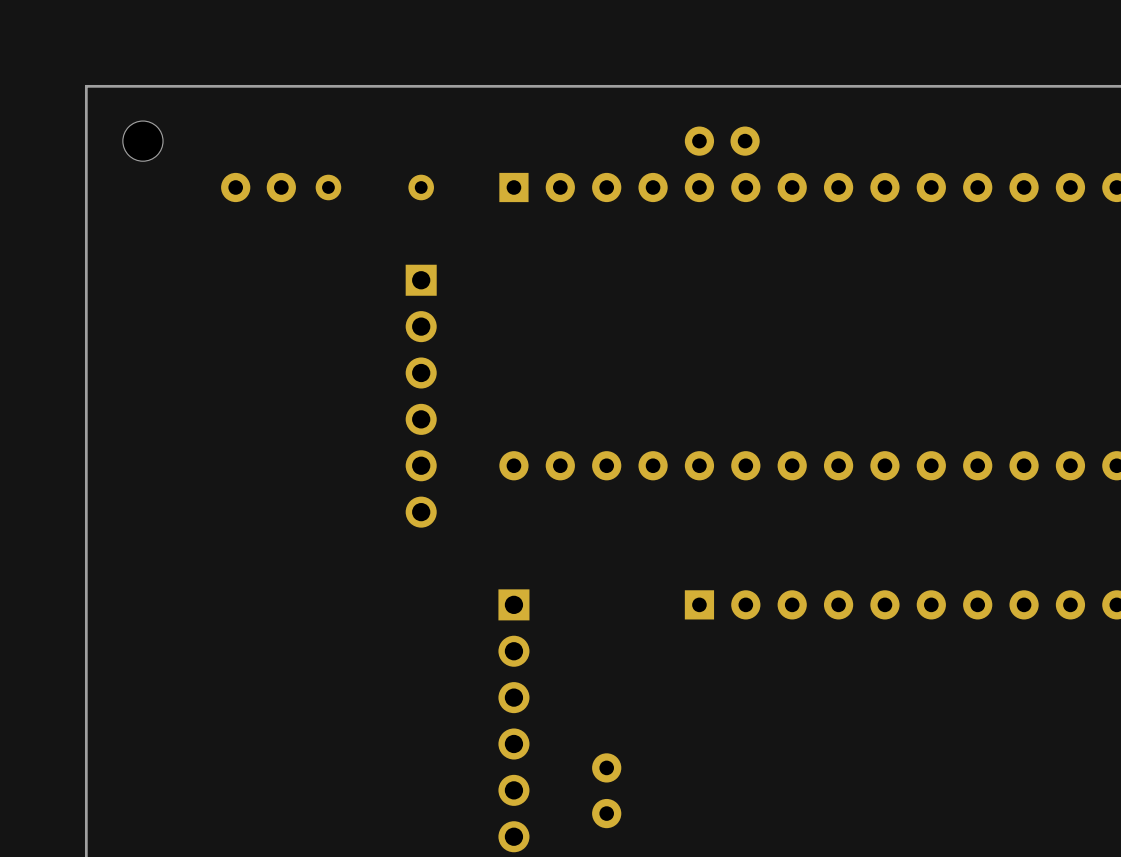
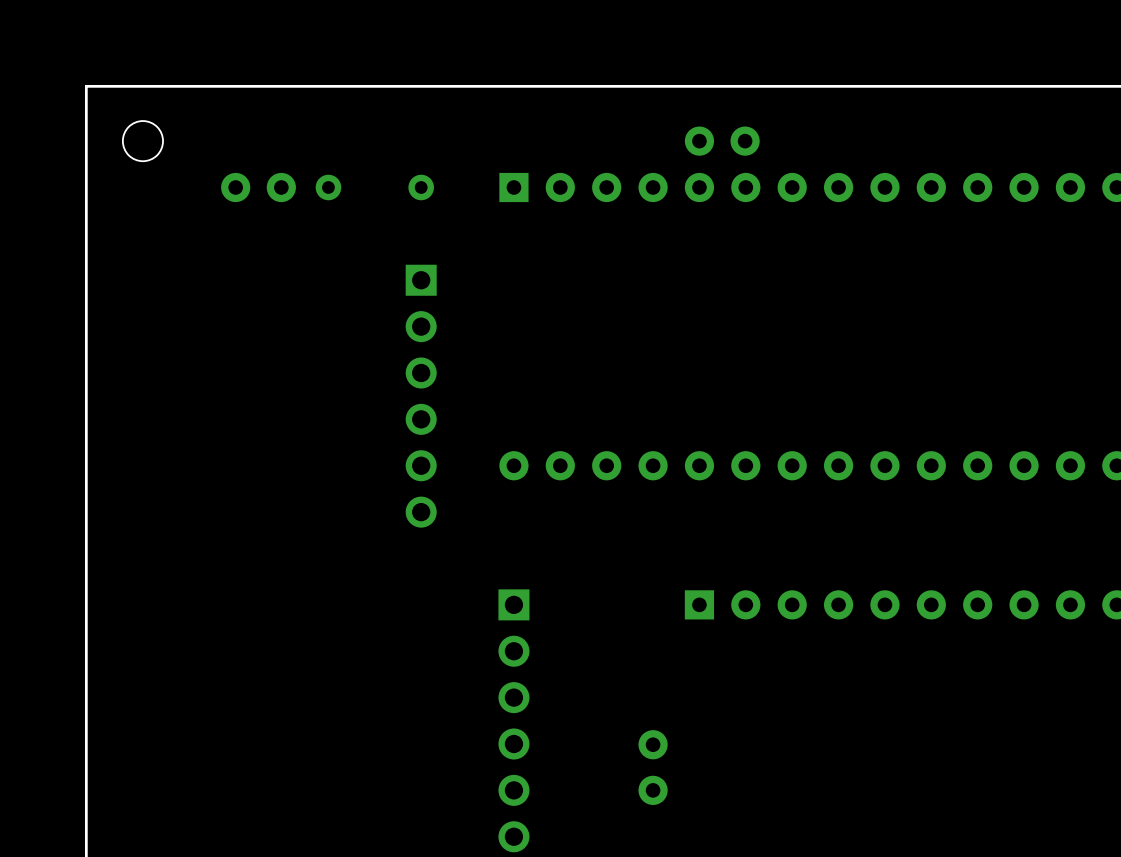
part position: (606, 790) -> (653, 767)

